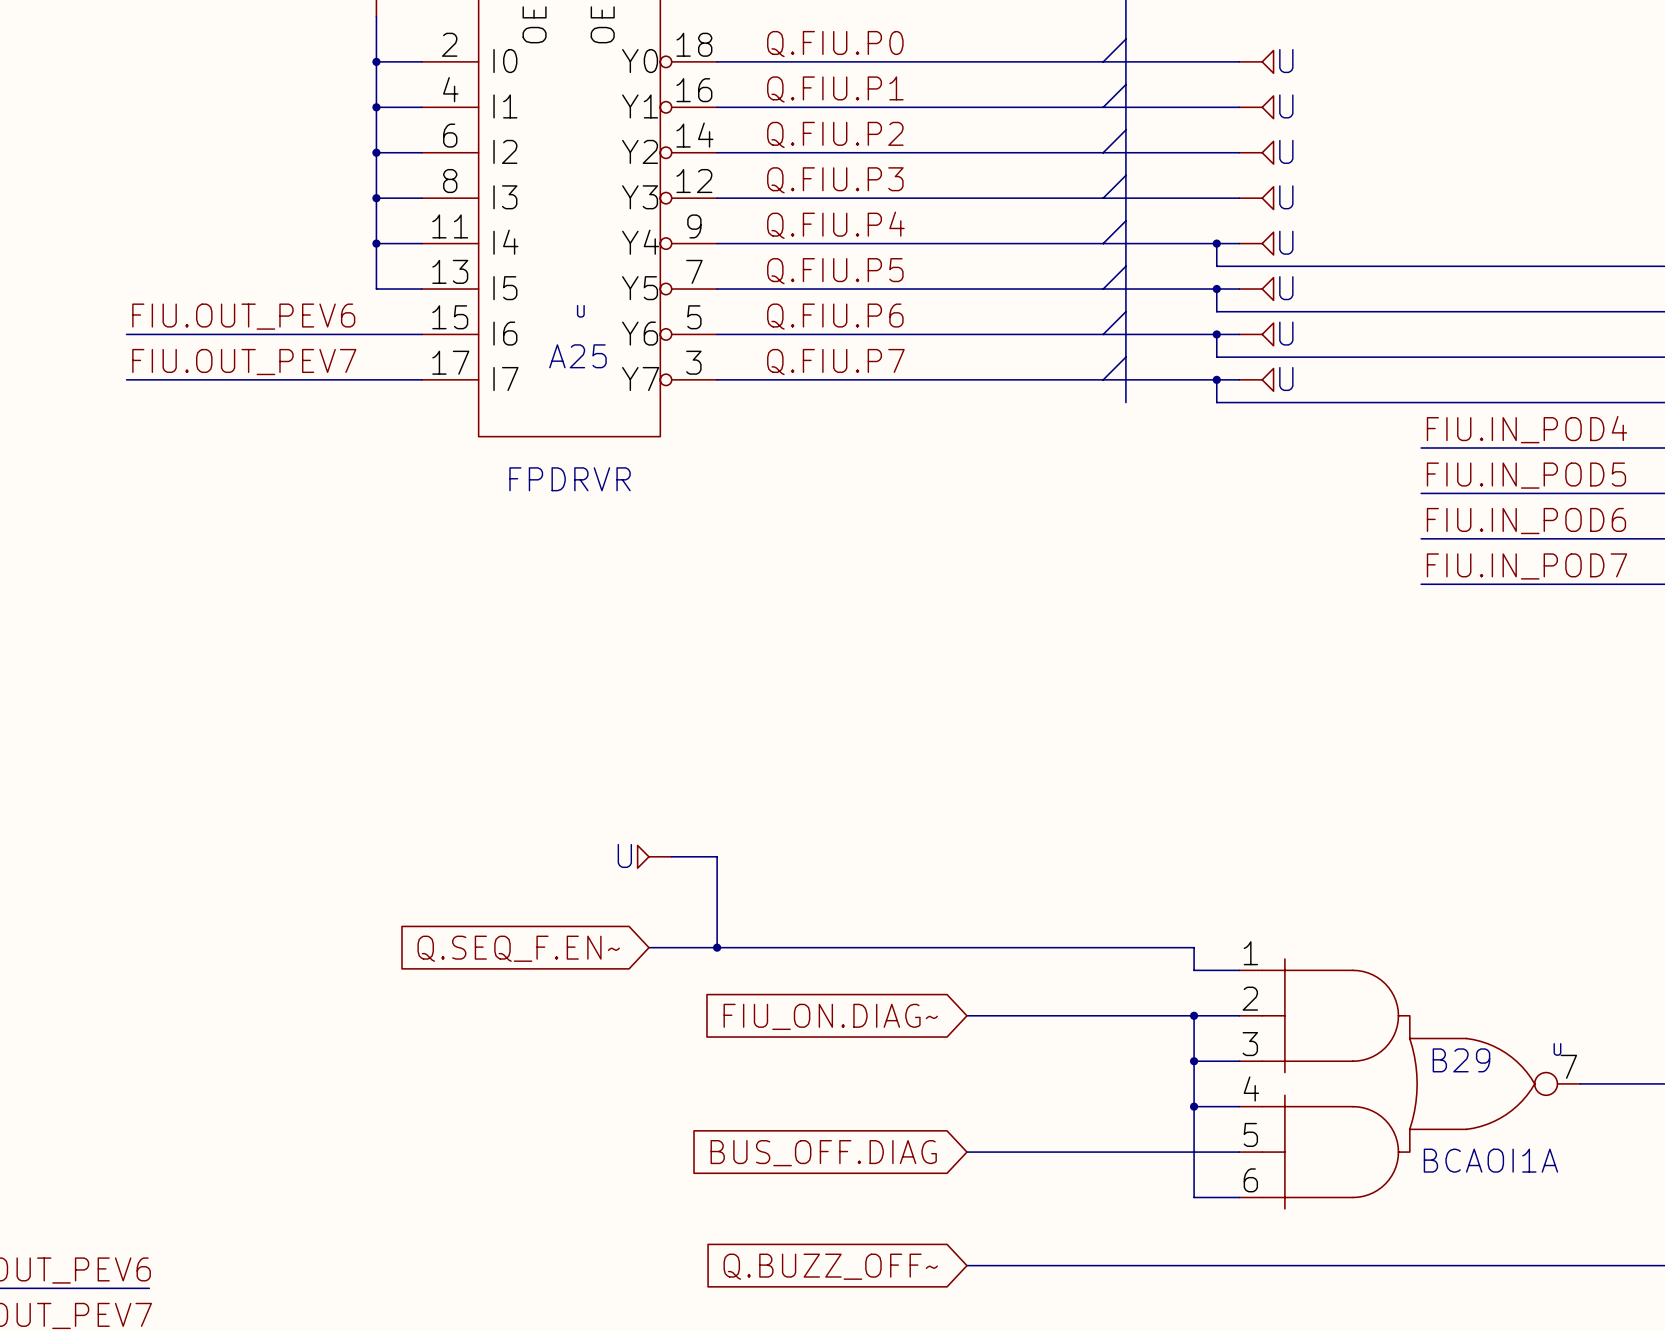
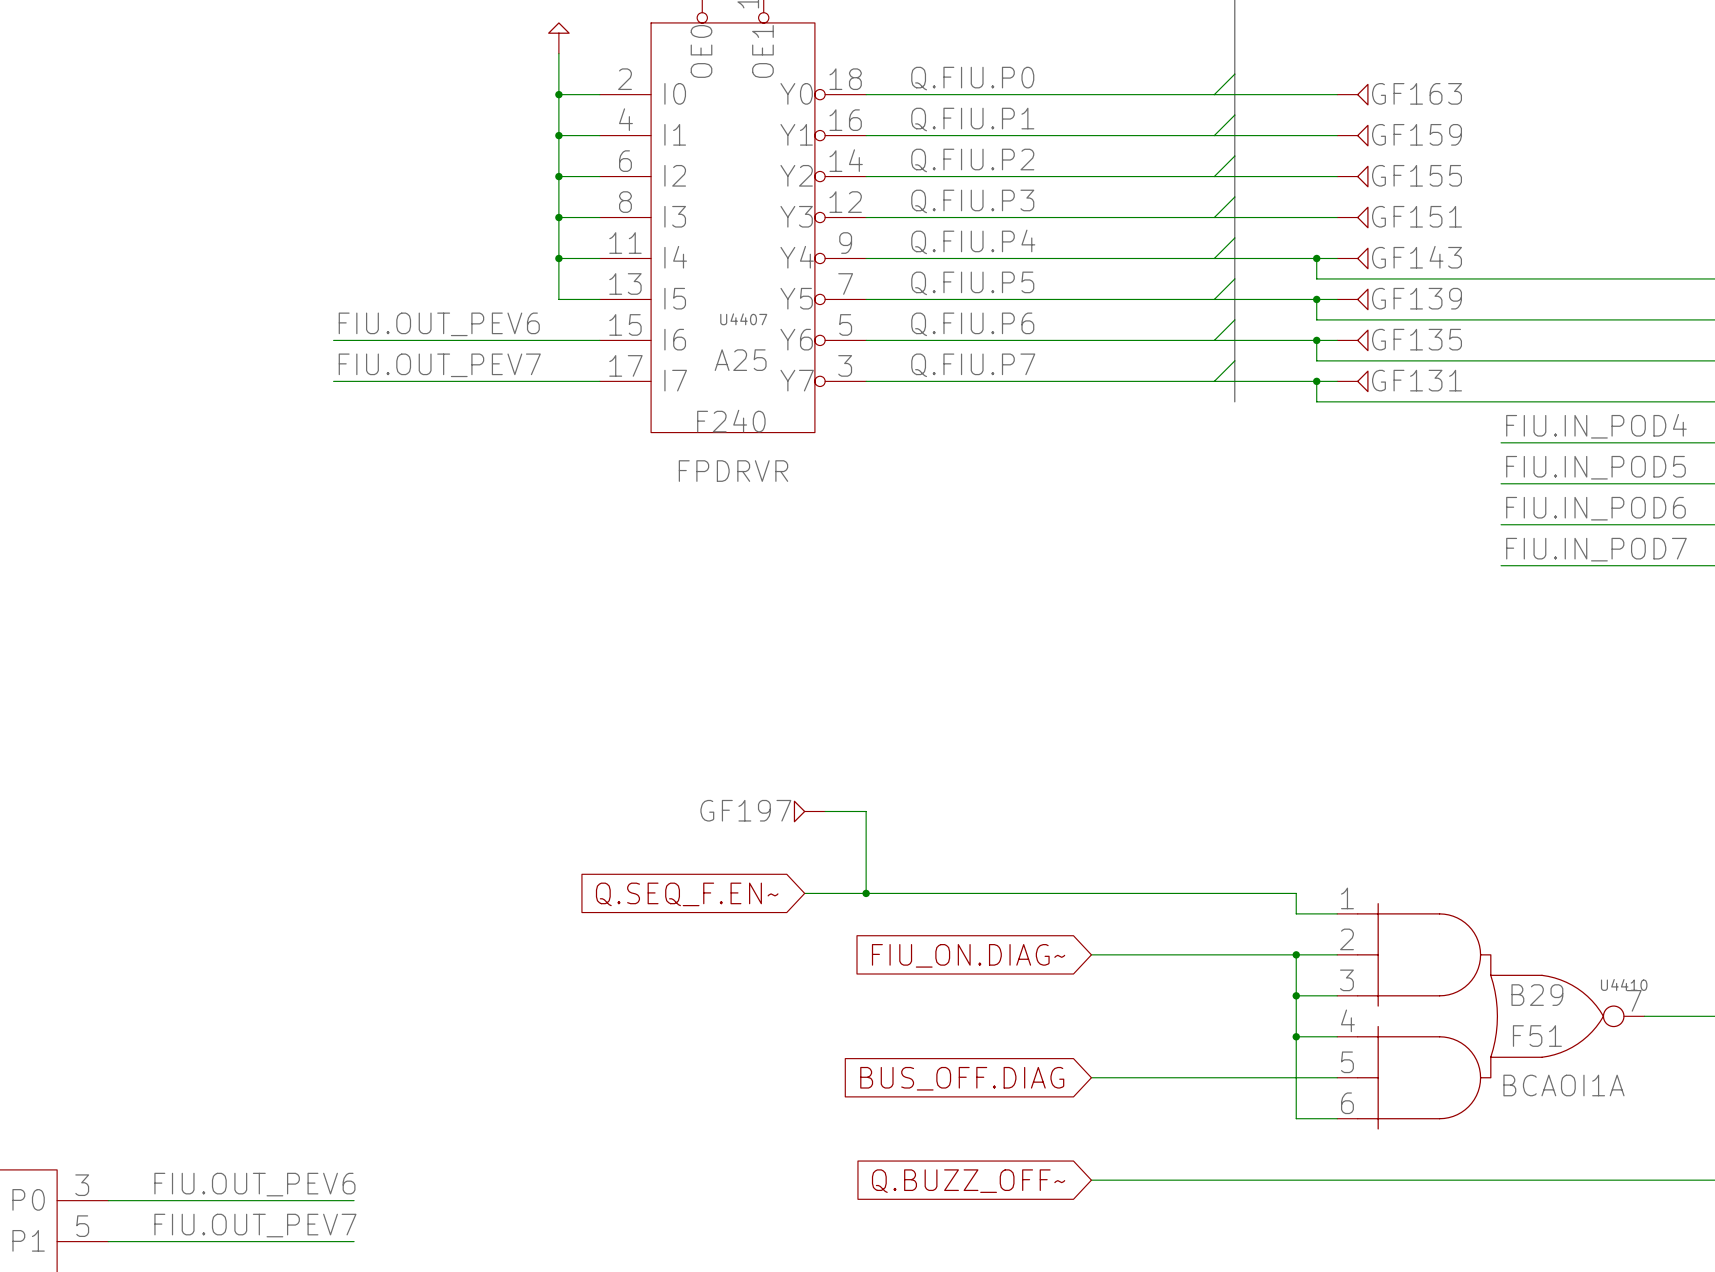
U name: U (1286, 61) -> GF163 (1417, 93)
U name: U (1286, 106) -> GF159 (1417, 134)
U name: U (1286, 151) -> GF155 (1417, 175)
U name: U (1286, 197) -> GF151 (1417, 216)
U name: U (1286, 242) -> GF143 (1417, 257)
U name: U (1286, 288) -> GF139 (1417, 298)
U name: U (580, 311) -> U4407 (743, 319)
U name: U (1286, 333) -> GF135 (1417, 339)
U name: U (1286, 379) -> GF131 (1417, 380)
U value: none -> F240 (731, 421)
U name: U (624, 855) -> GF197 (745, 810)
U name: U (1557, 1049) -> U4410 (1624, 984)
U value: none -> F51 (1537, 1036)

